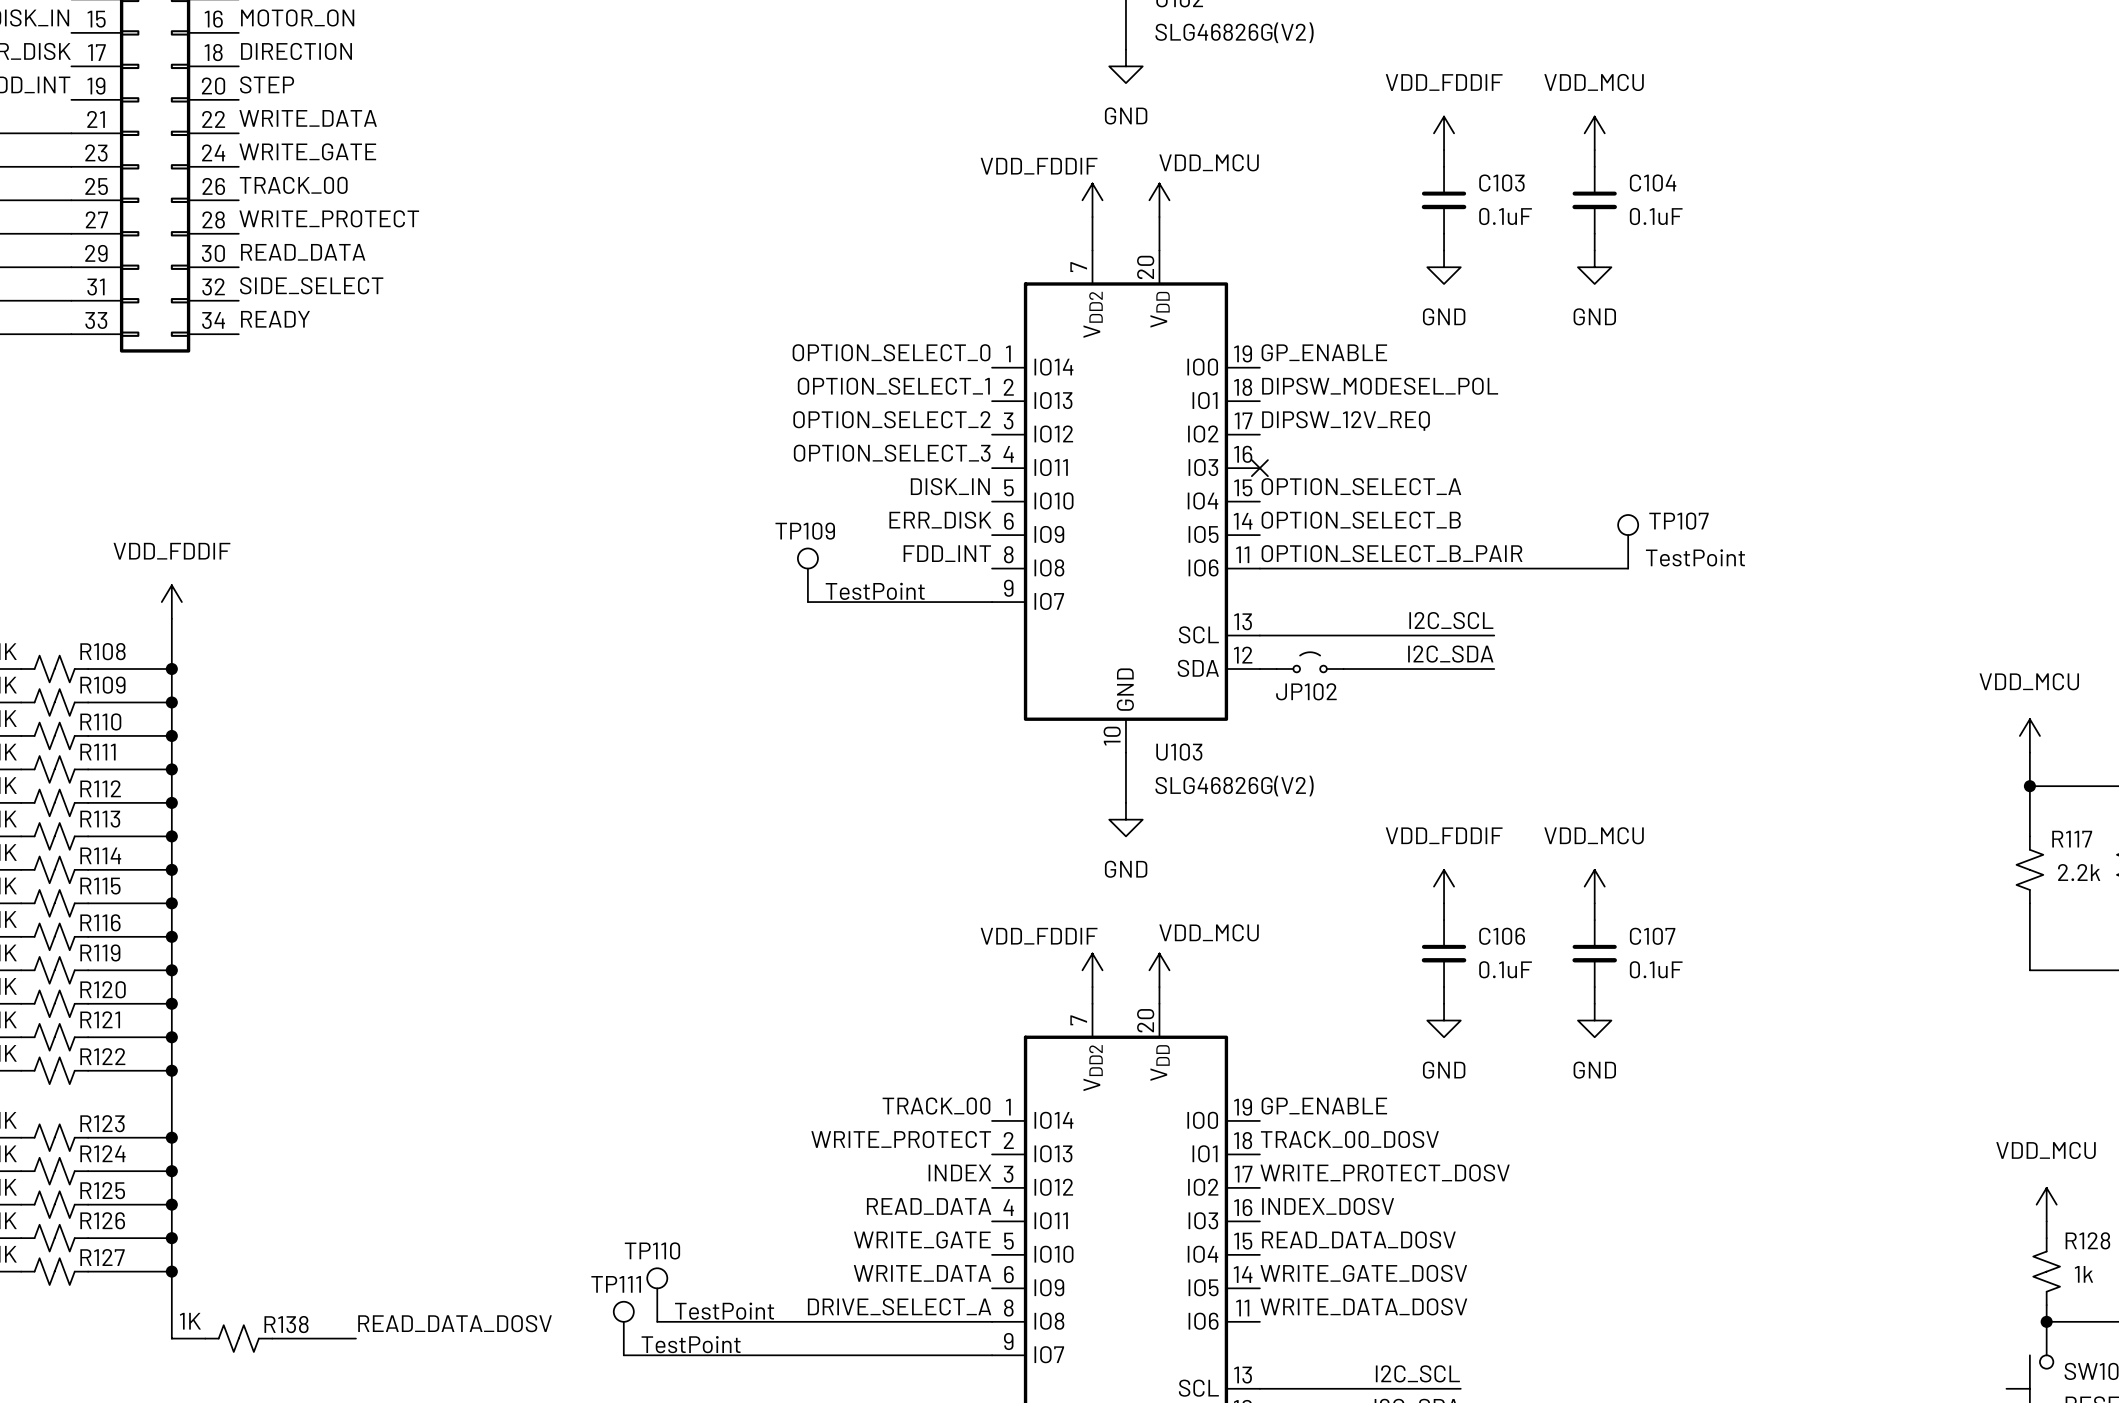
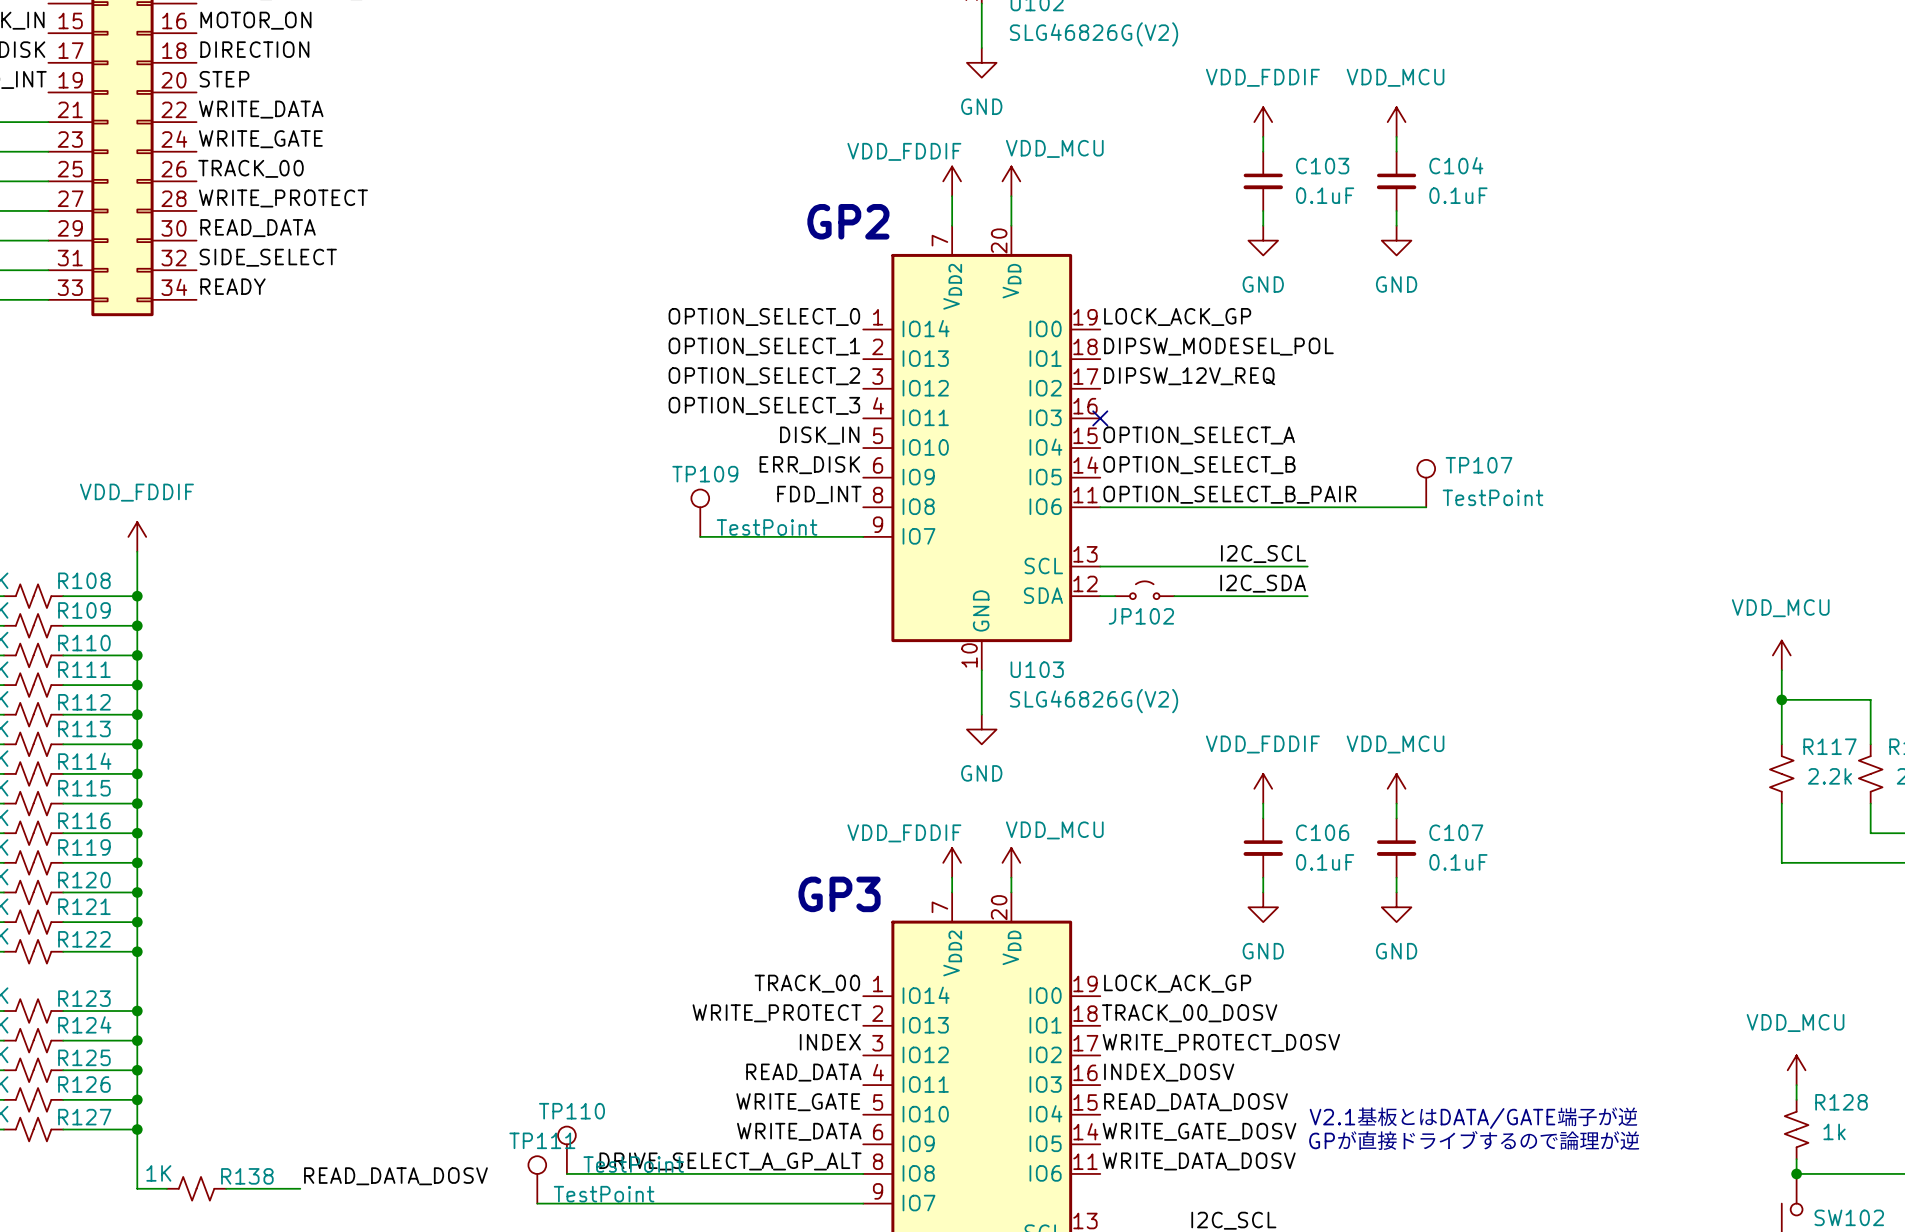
text: none -> GP2 (848, 221)
label: GP_ENABLE (1324, 352) -> LOCK_ACK_GP (1177, 316)
text: none -> GP3 (839, 894)
label: GP_ENABLE (1324, 1106) -> LOCK_ACK_GP (1177, 983)
text: none -> V2.1基板とはDATA/GATE端子が逆 (1473, 1117)
text: none -> GPが直接ドライブするので論理が逆 (1474, 1140)
label: DRIVE_SELECT_A (899, 1306) -> DRIVE_SELECT_A_GP_ALT (730, 1161)

